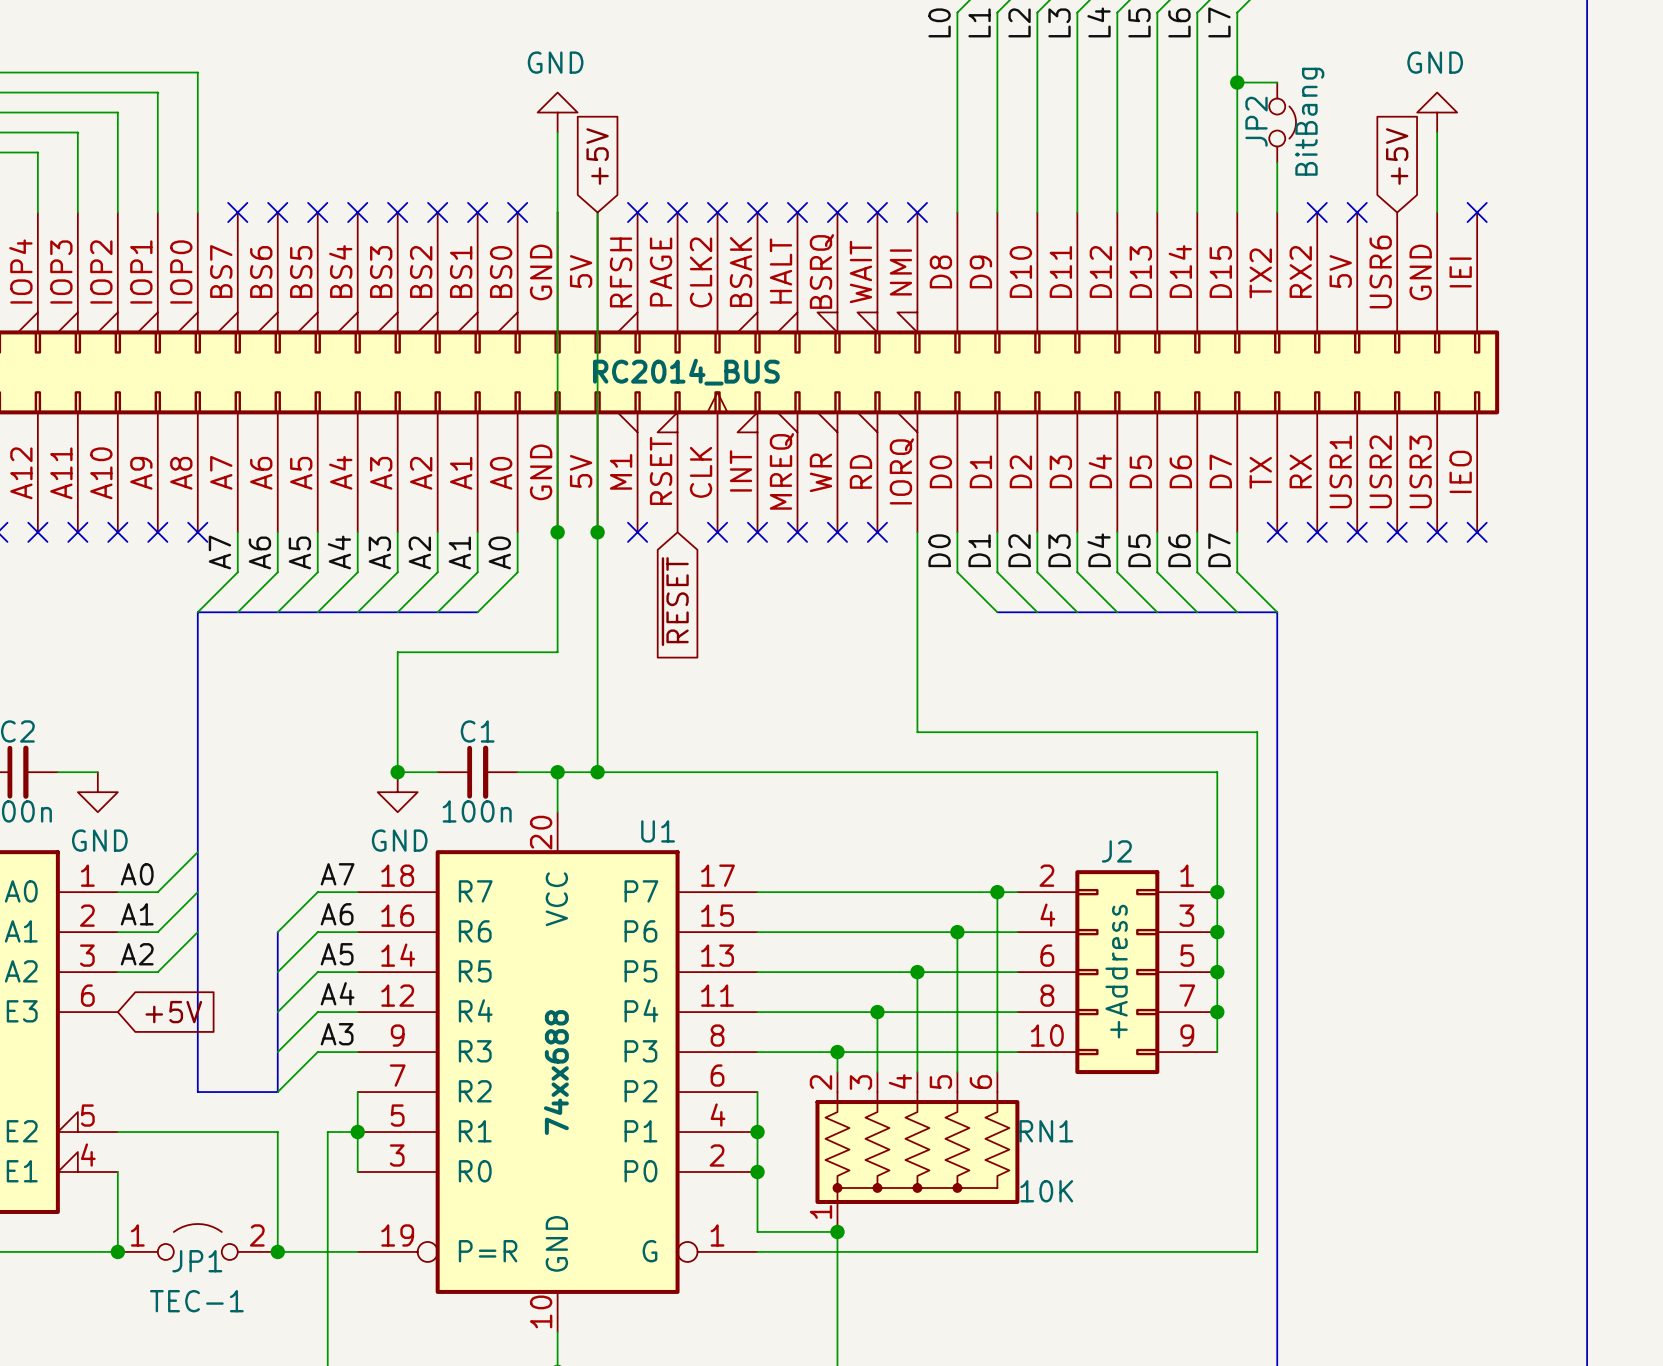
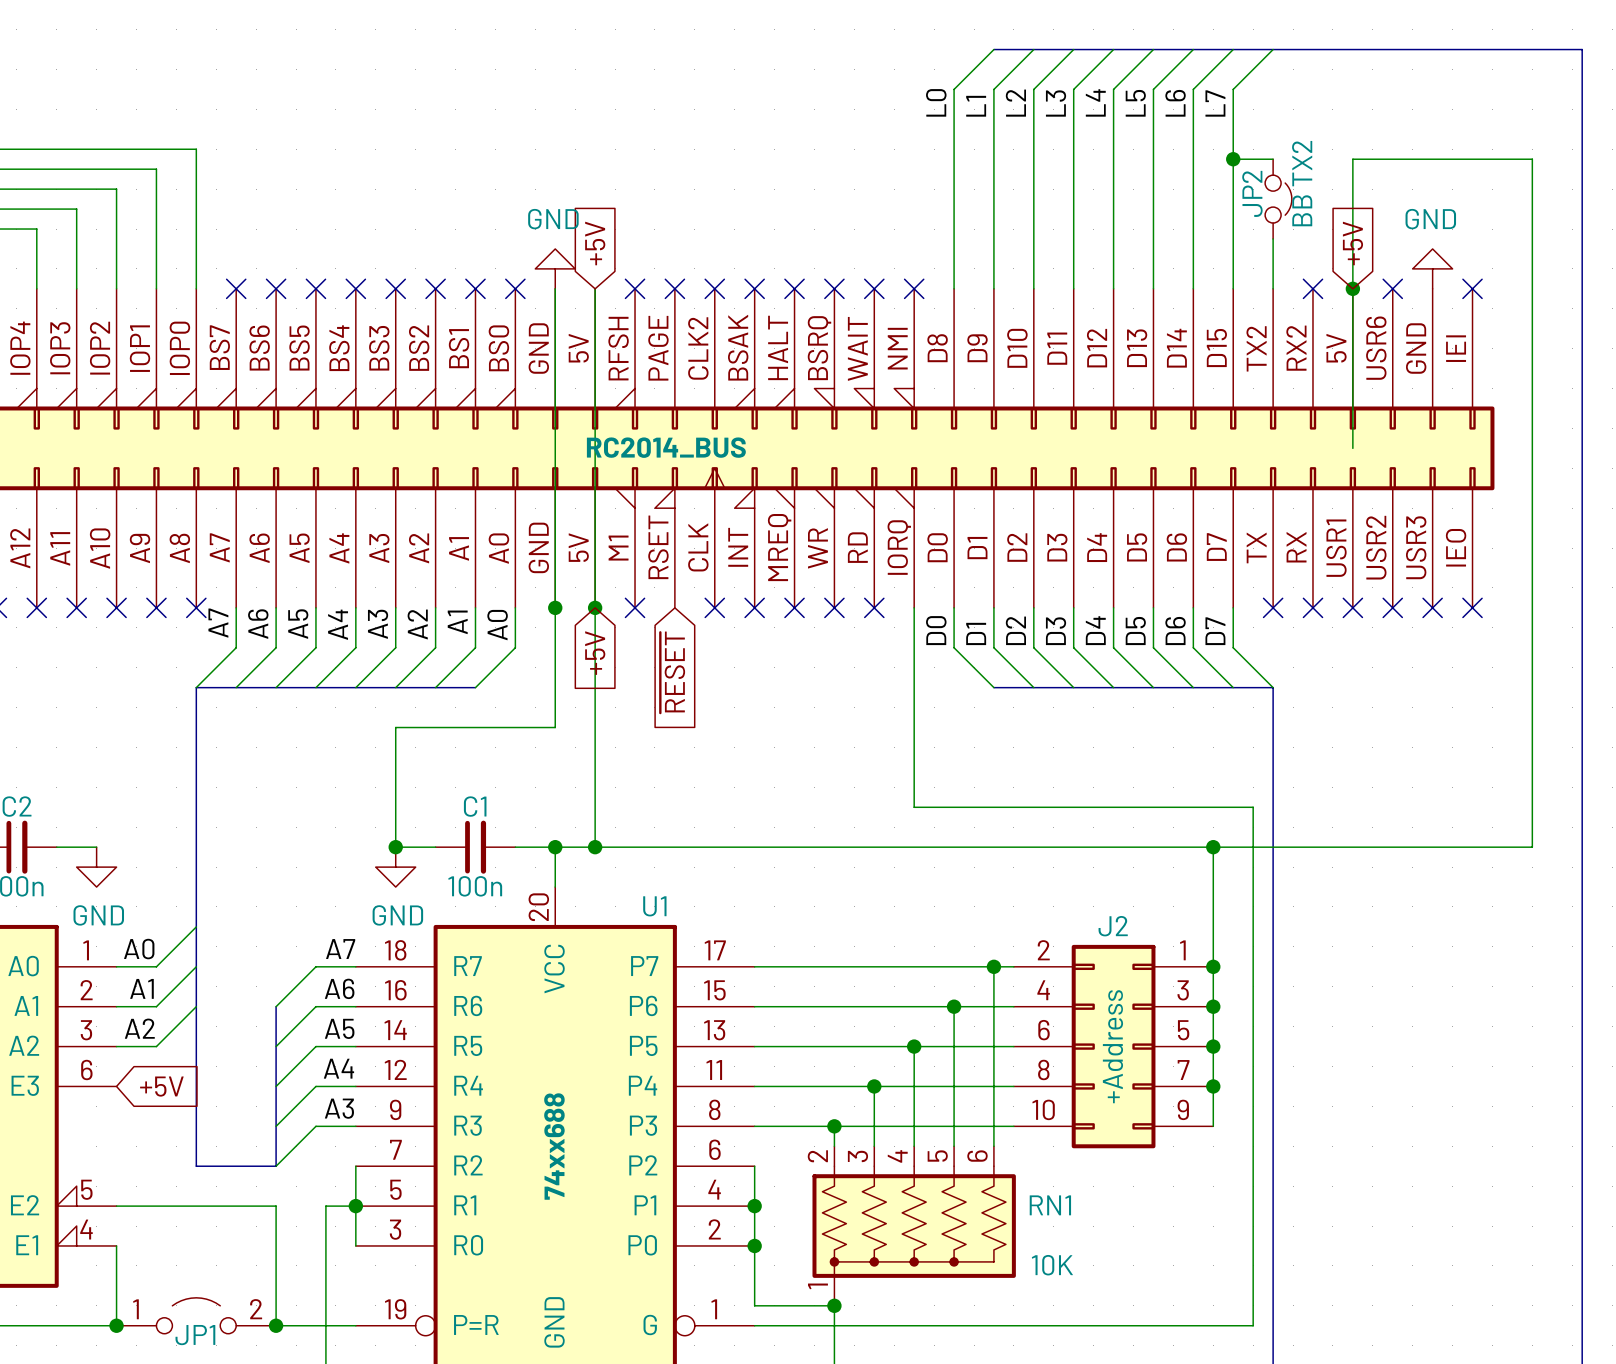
power symbol position: GND (557, 112) -> GND (555, 268)
power symbol position: GND (1437, 112) -> GND (1432, 268)
JP2 value: BitBang (1309, 121) -> BB TX2 (1302, 183)
wire: (557, 132) (557, 212) -> none
wire: (1437, 132) (1437, 212) -> none
global label position: +5V (1397, 156) -> +5V (1352, 243)
no-connect mark position: (1357, 212) -> (1392, 288)
junction: none -> (1352, 288)
wire: none -> (1352, 448) (1352, 159) (1532, 159) (1532, 847) (1213, 847)
global label: none -> +5V (595, 653)
junction: none -> (1213, 847)

